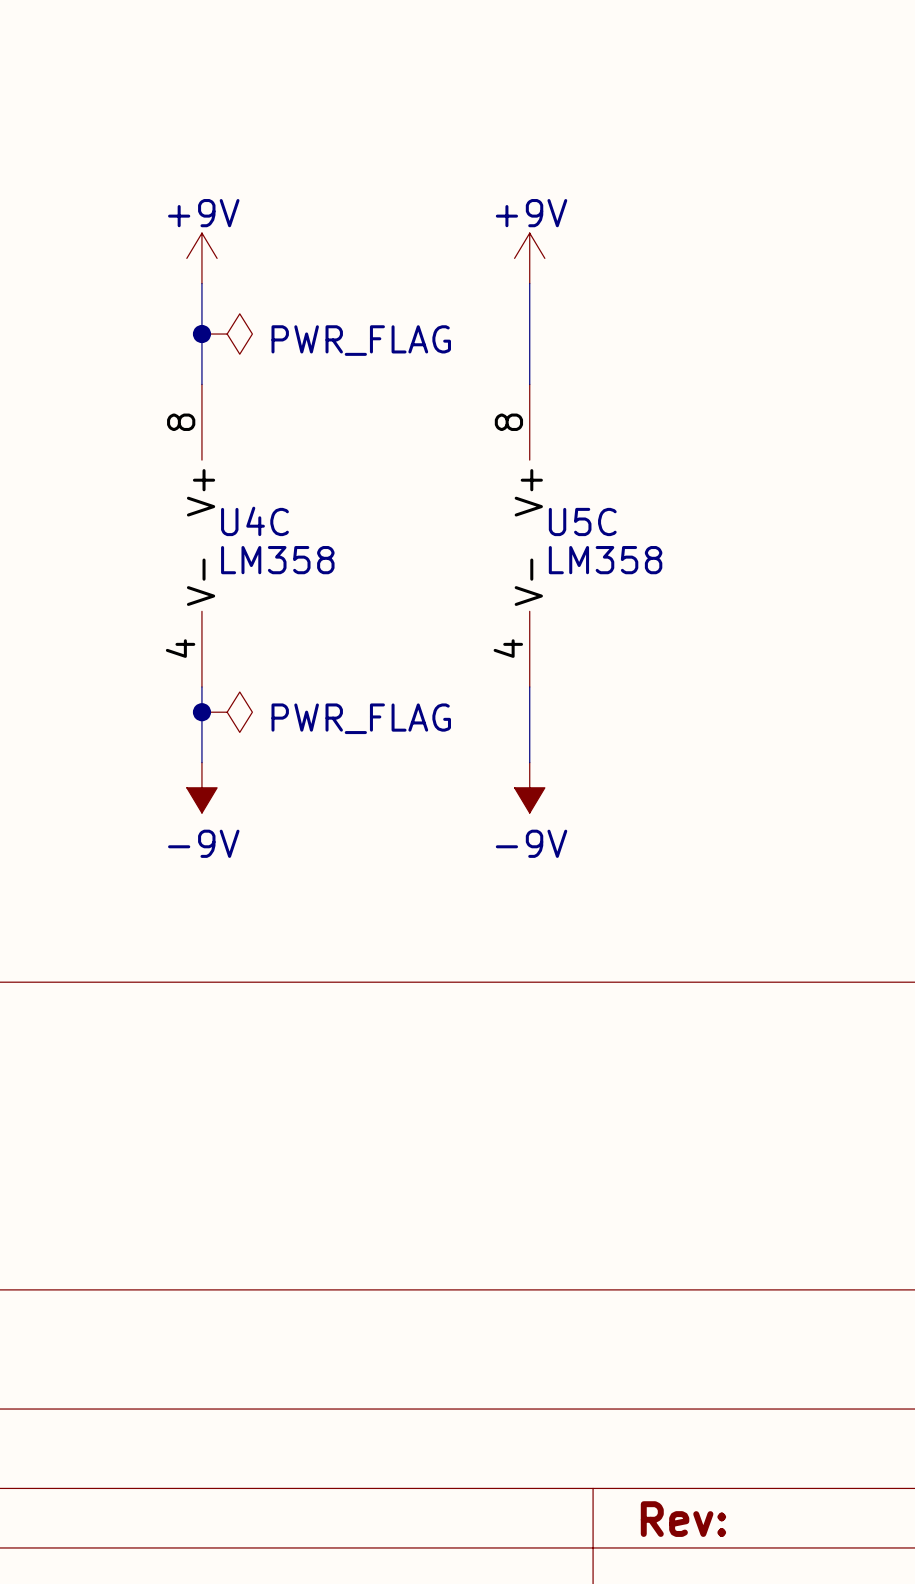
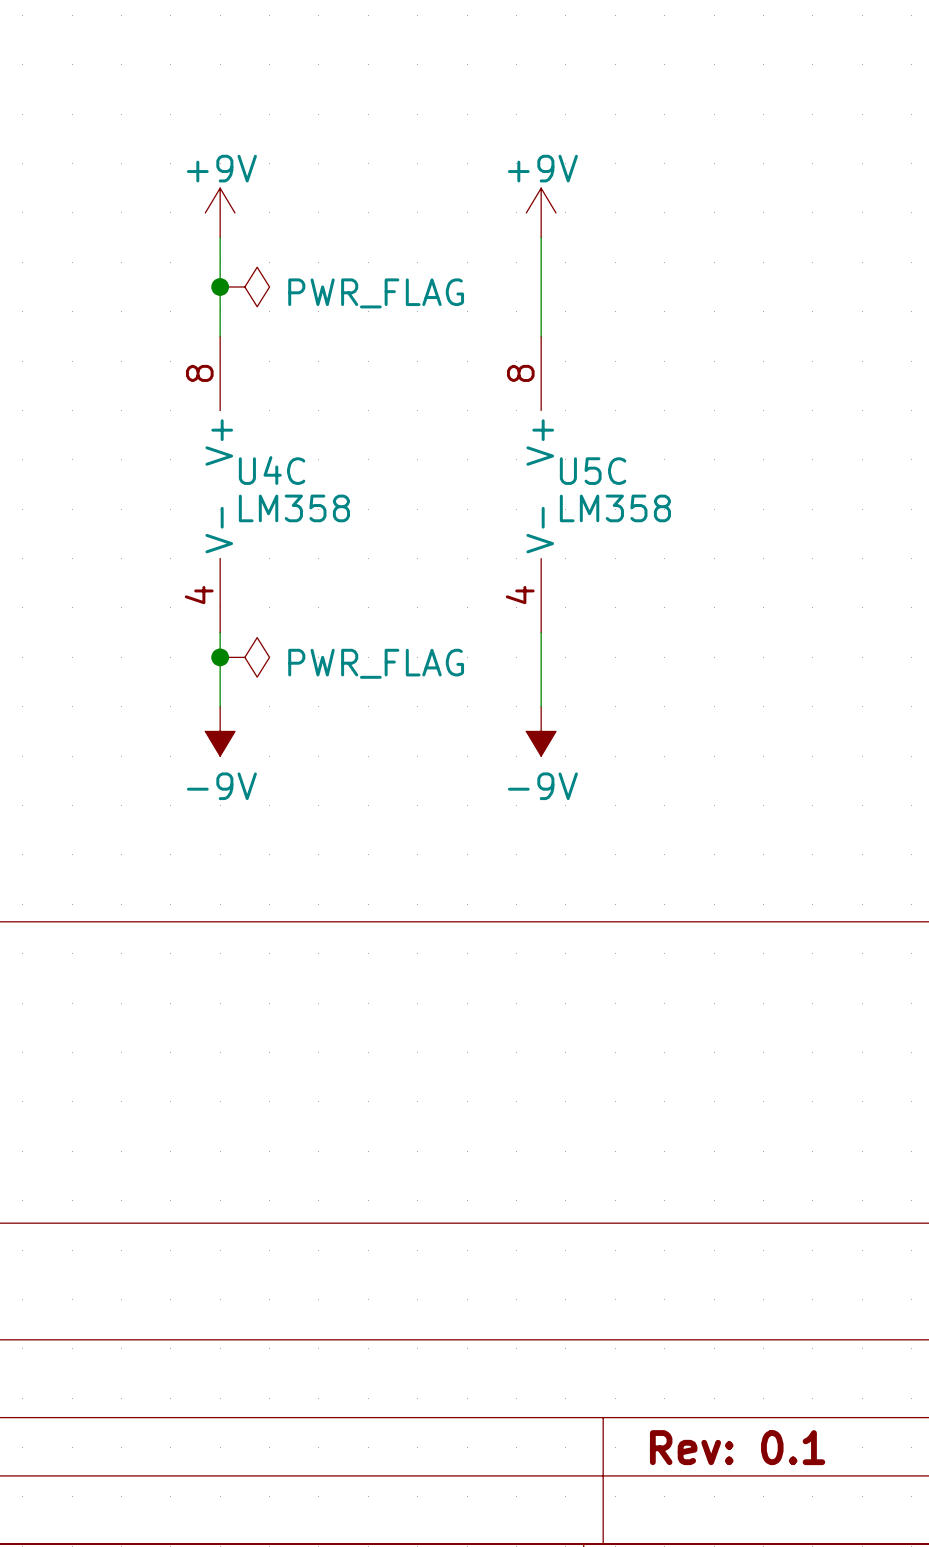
title block: Rev: (683, 1519) -> Rev: 0.1 (737, 1447)

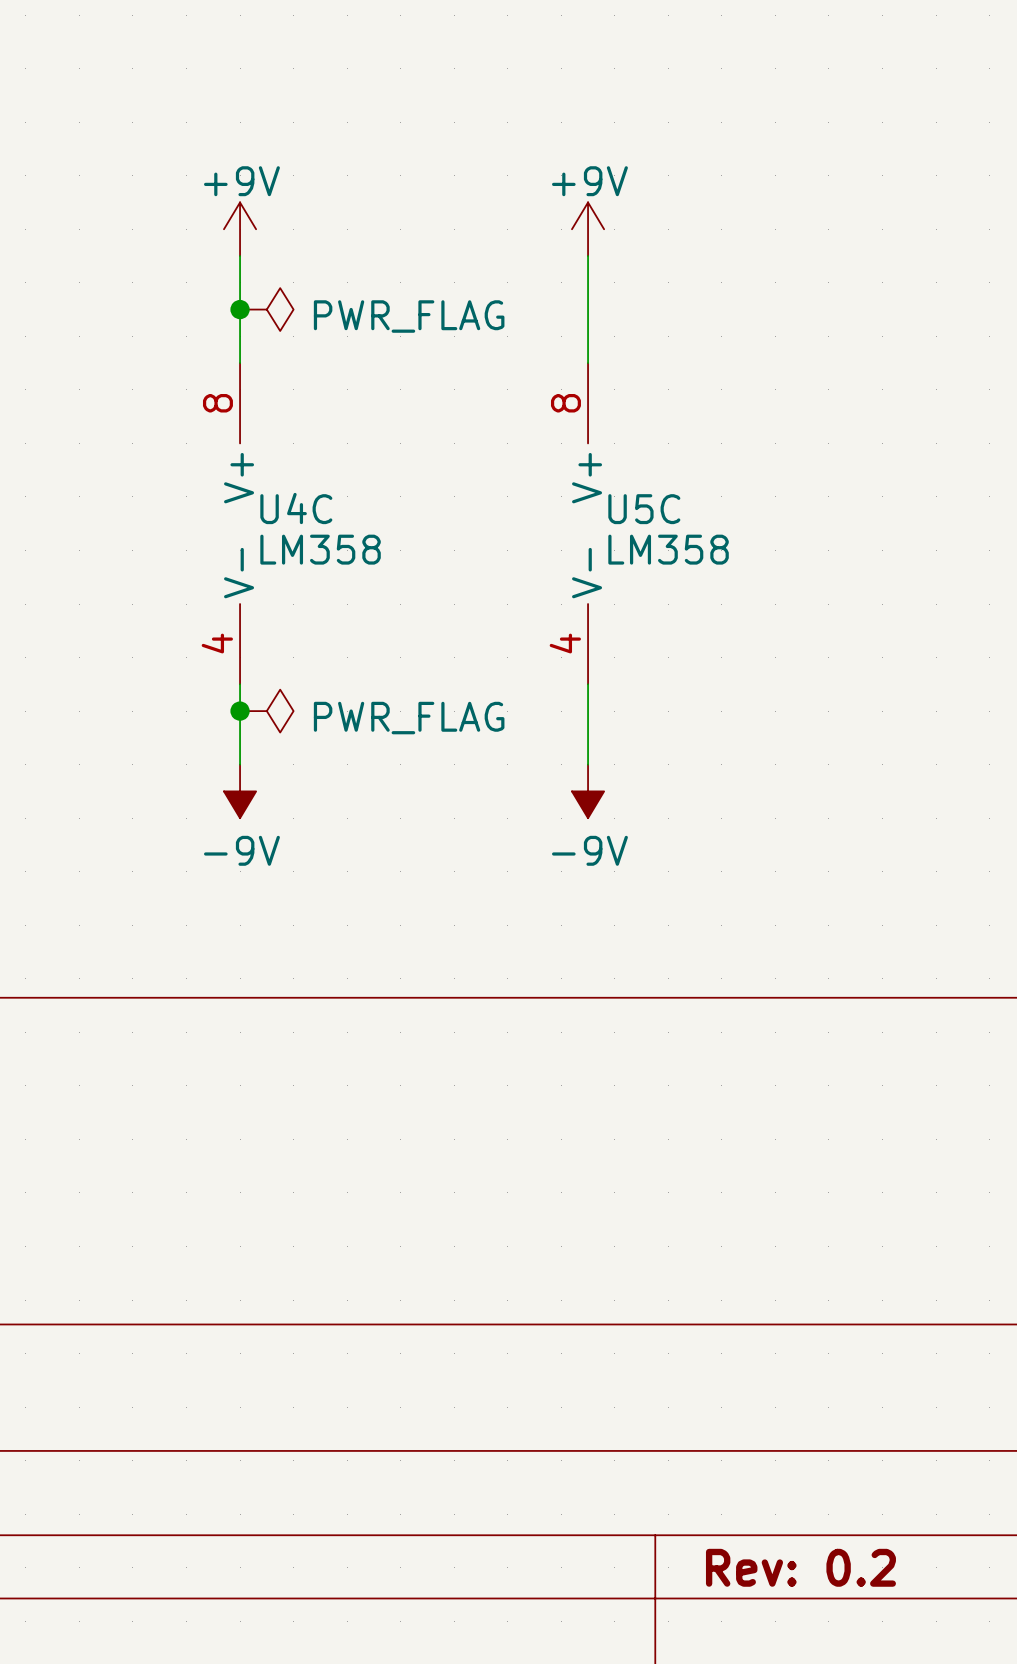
title block: Rev: 0.1 (737, 1447) -> Rev: 0.2 (800, 1567)

